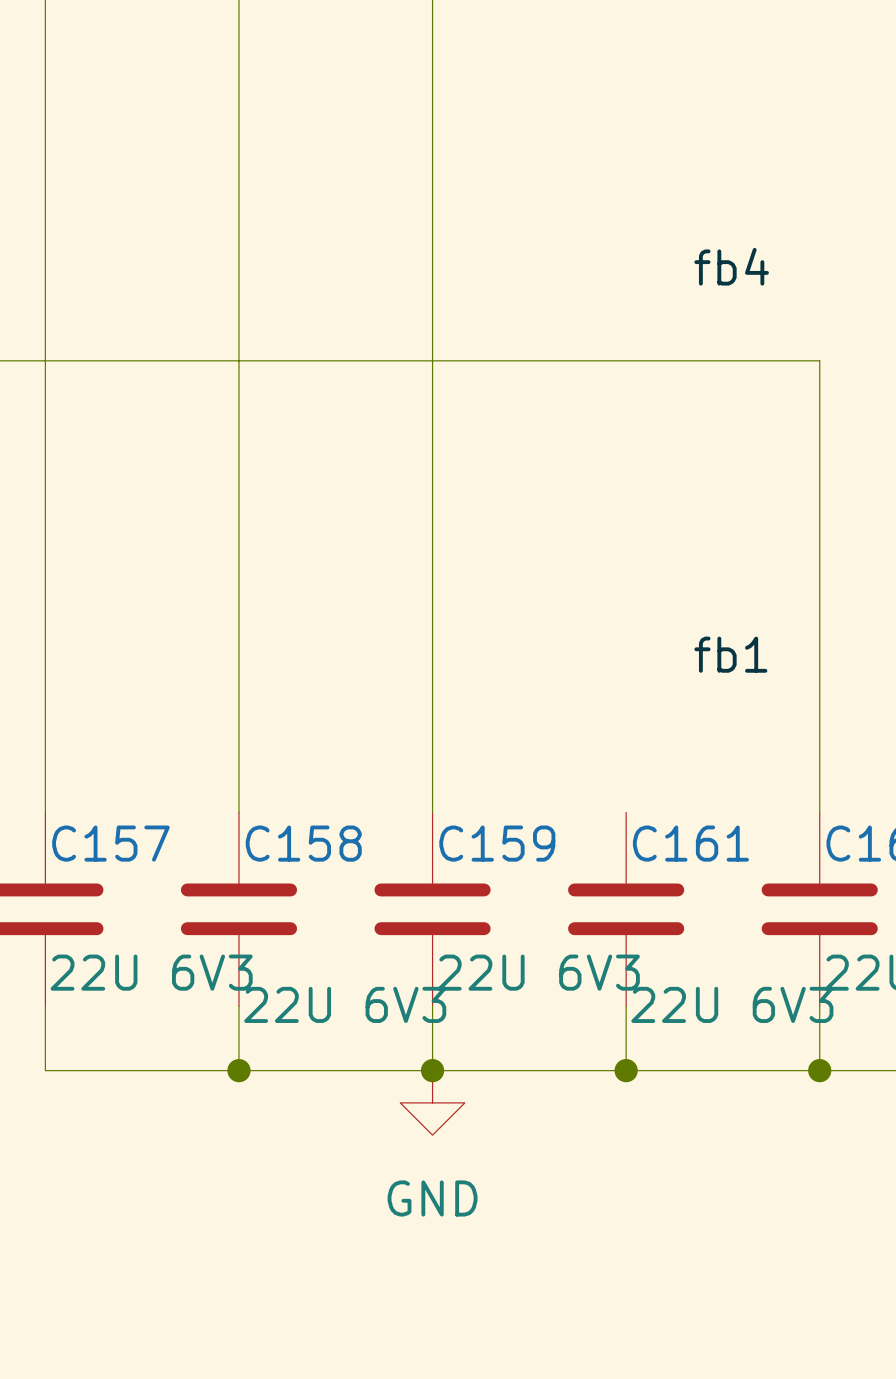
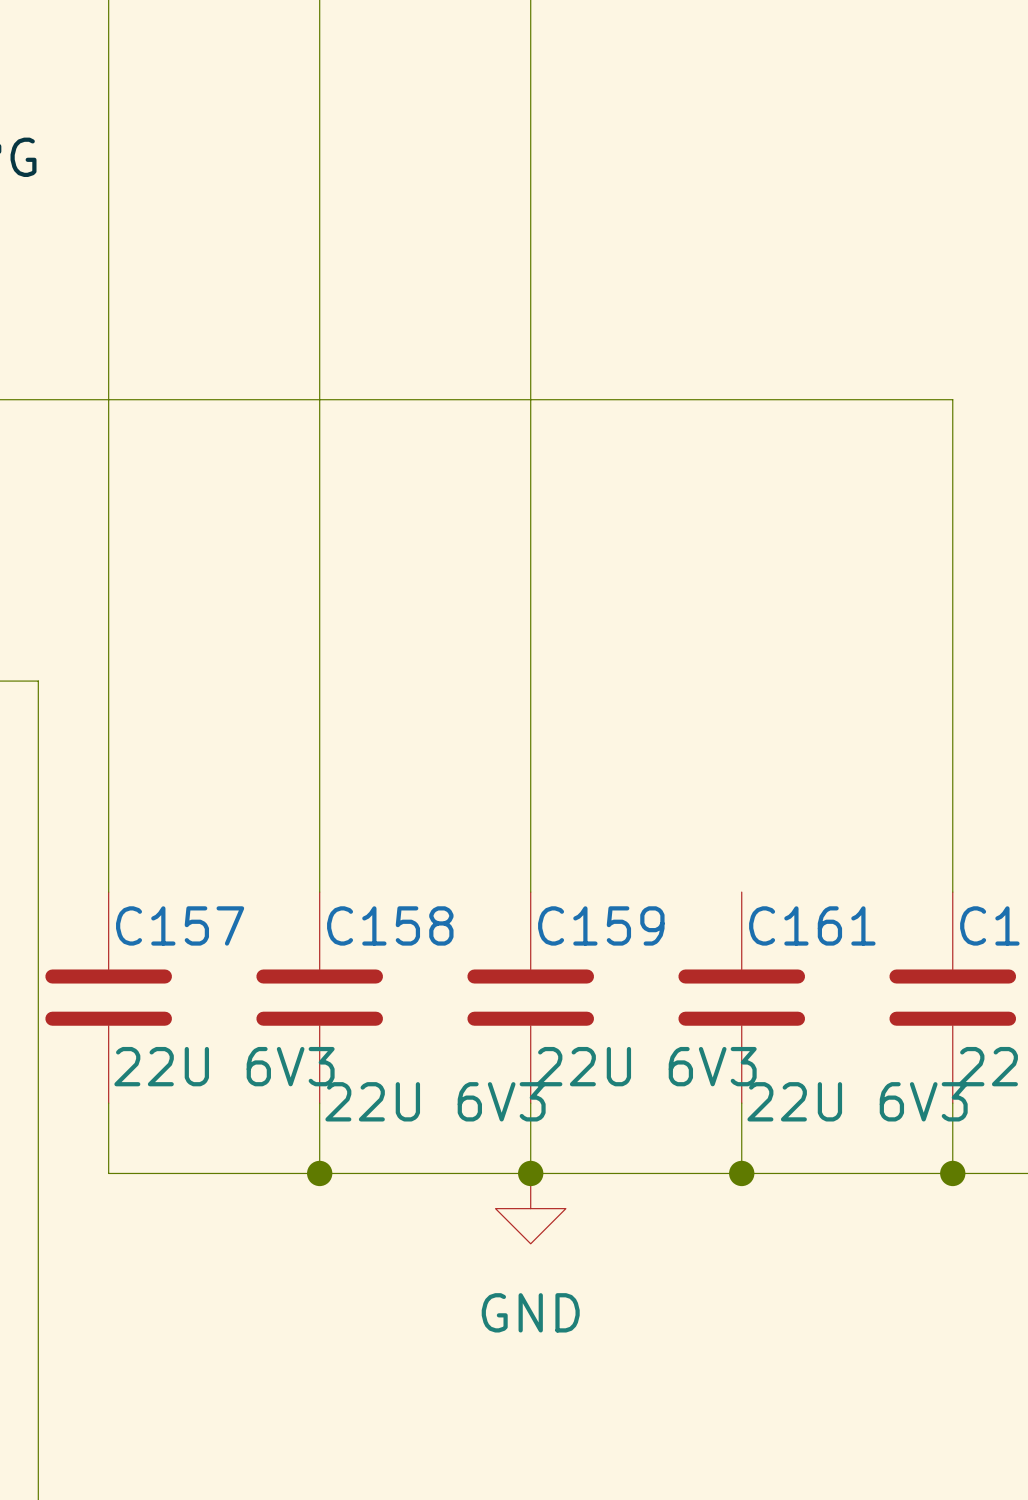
label: fb4 (731, 266) -> none
label: fb1 (730, 654) -> none

